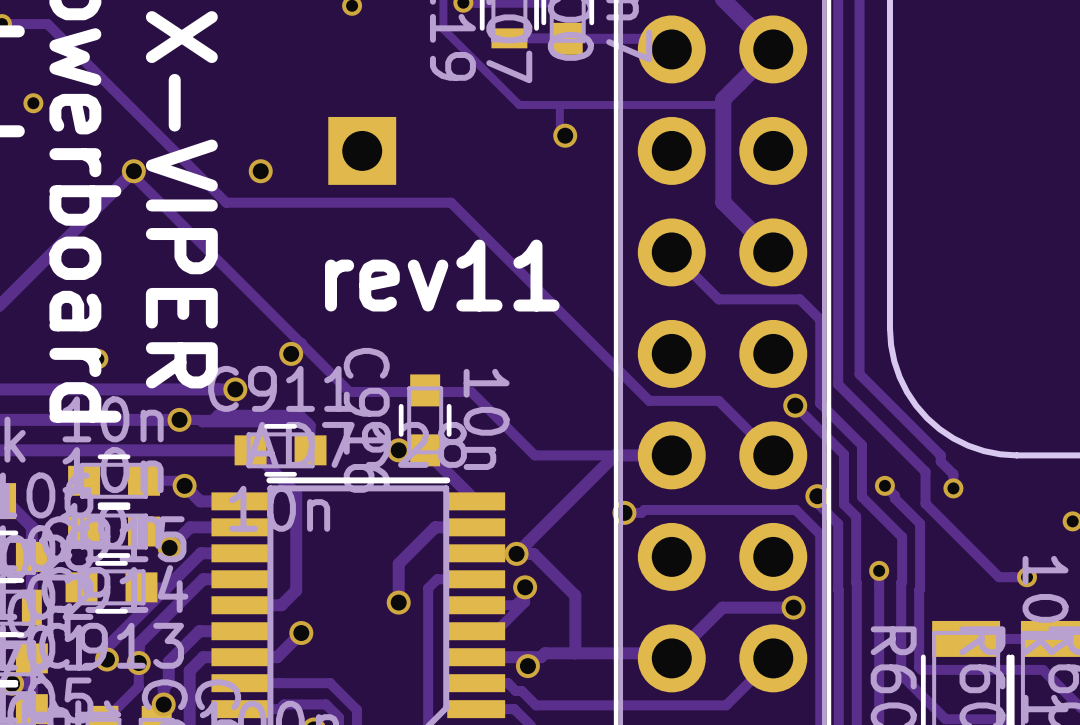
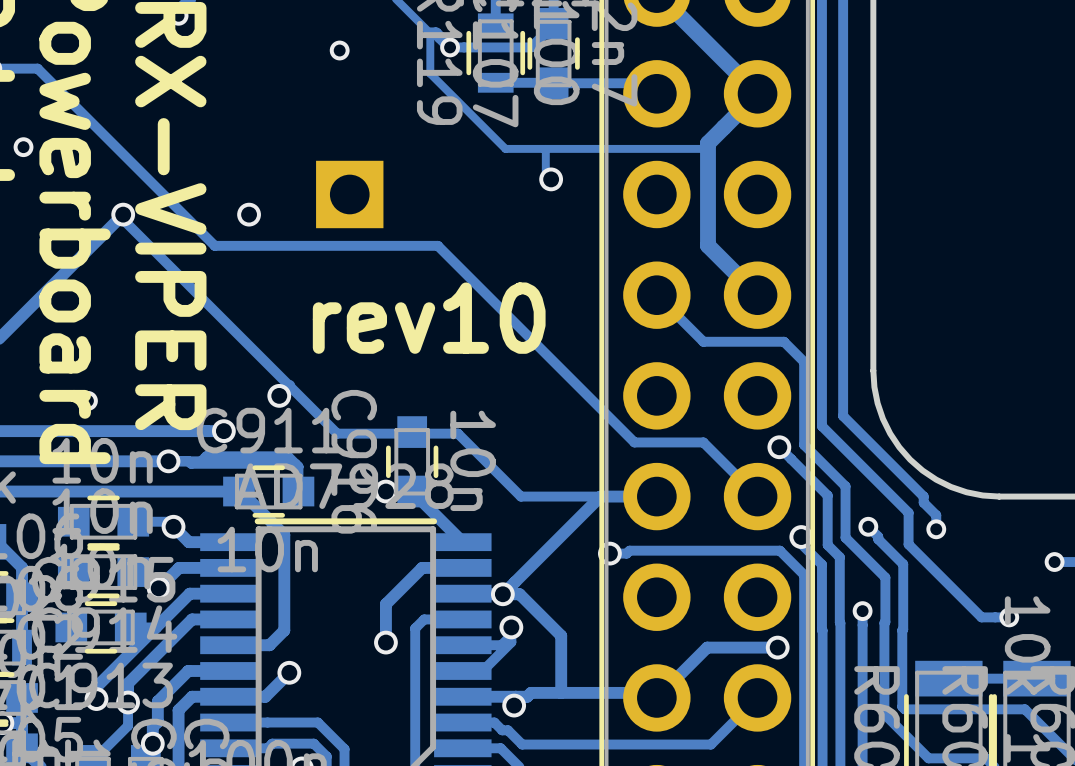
text: rev11 (442, 275) -> rev10 (429, 318)

